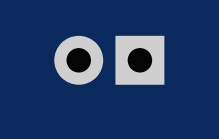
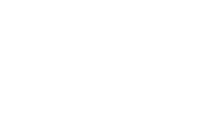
part: (109, 60) -> none

